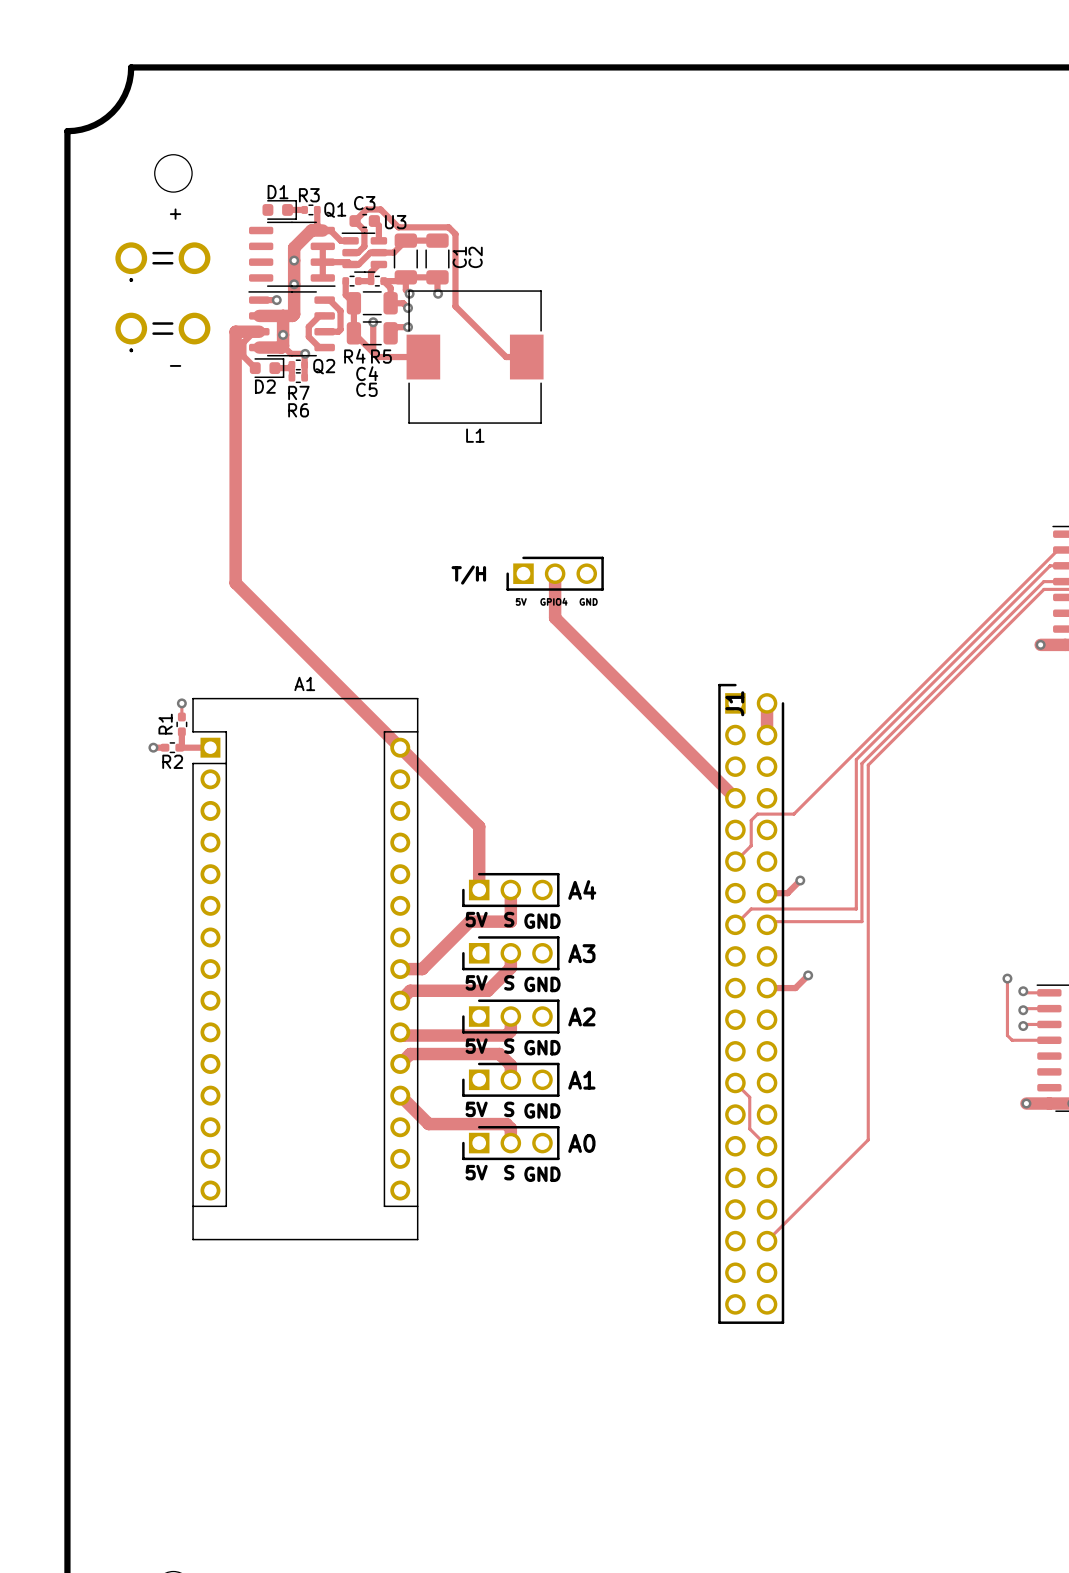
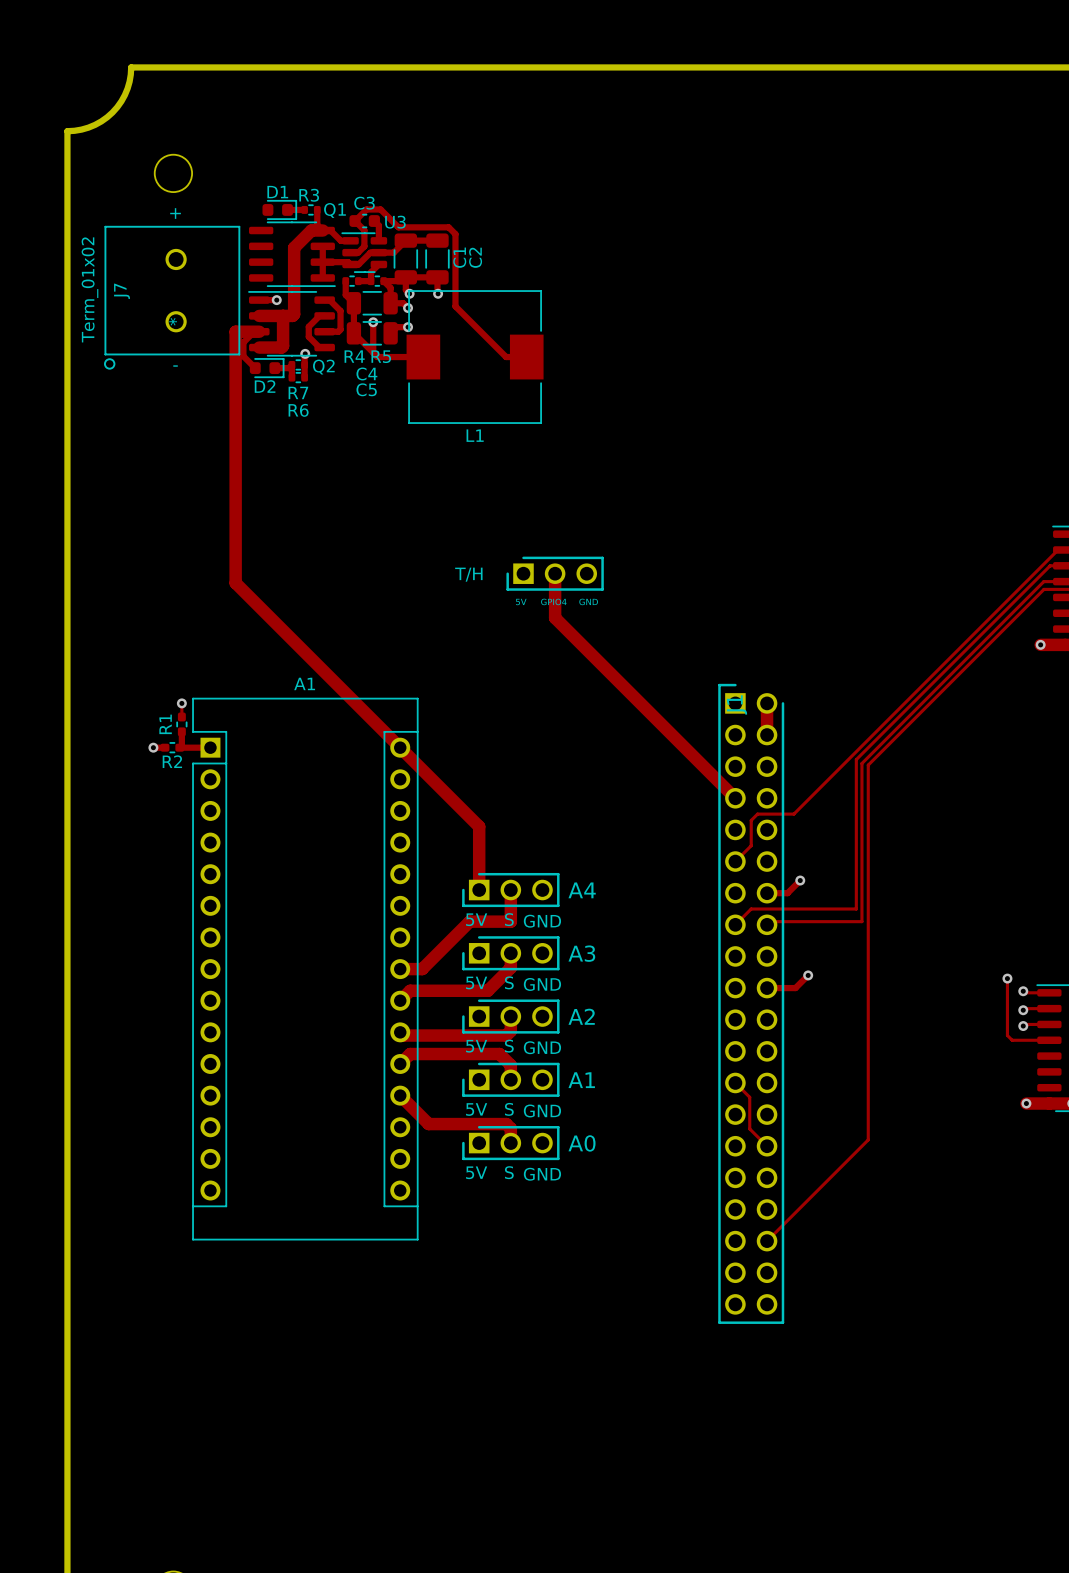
via: (294, 260) -> none
part: (162, 262) -> none
via: (294, 284) -> none
J7: none -> Term_01x02 (172, 297)
part: (162, 332) -> none
via: (283, 334) -> none
track: (283, 345) (291, 353) (305, 353) -> none

